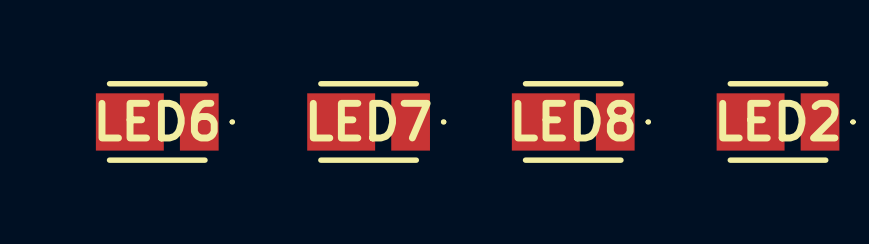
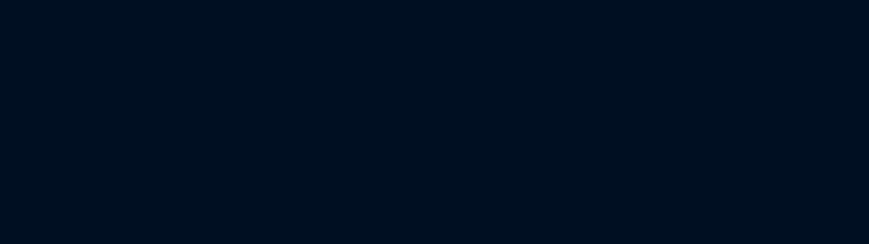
LED6: (165, 121) -> none
LED7: (376, 121) -> none
LED8: (581, 121) -> none
LED2: (786, 121) -> none

